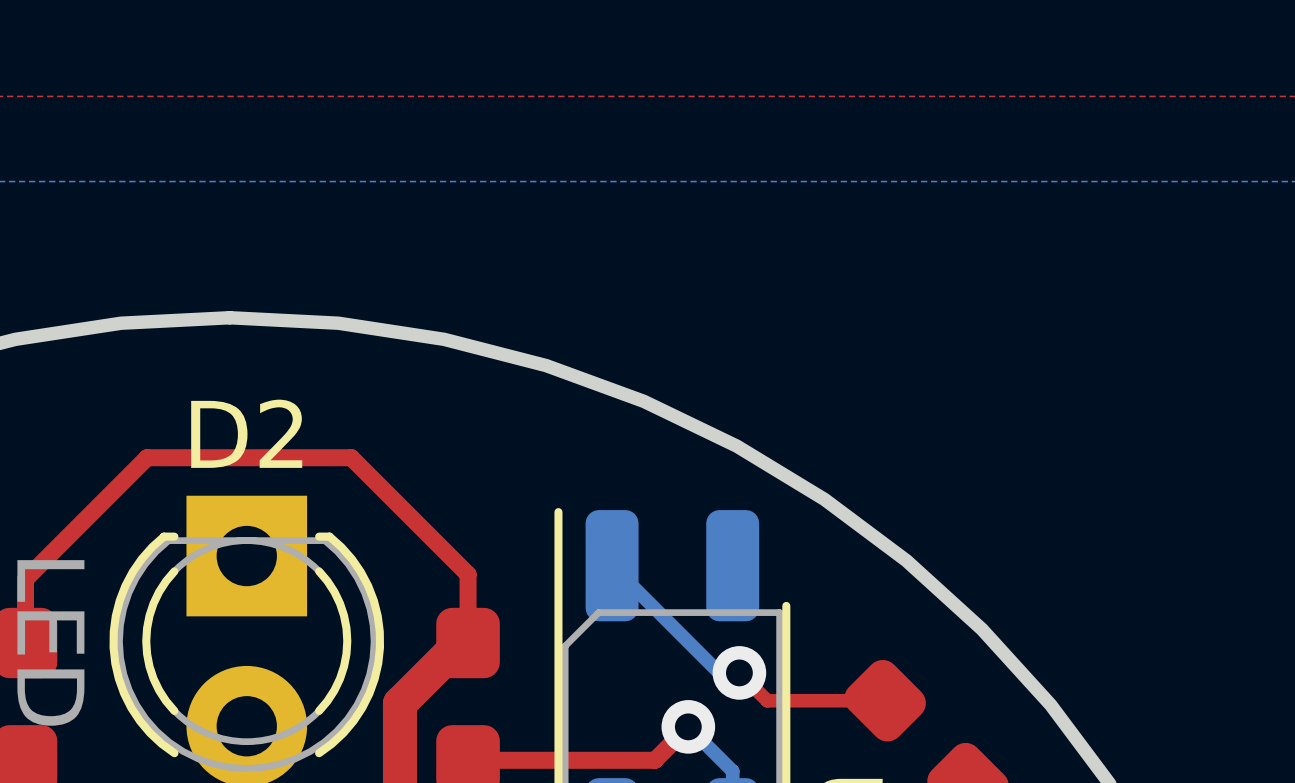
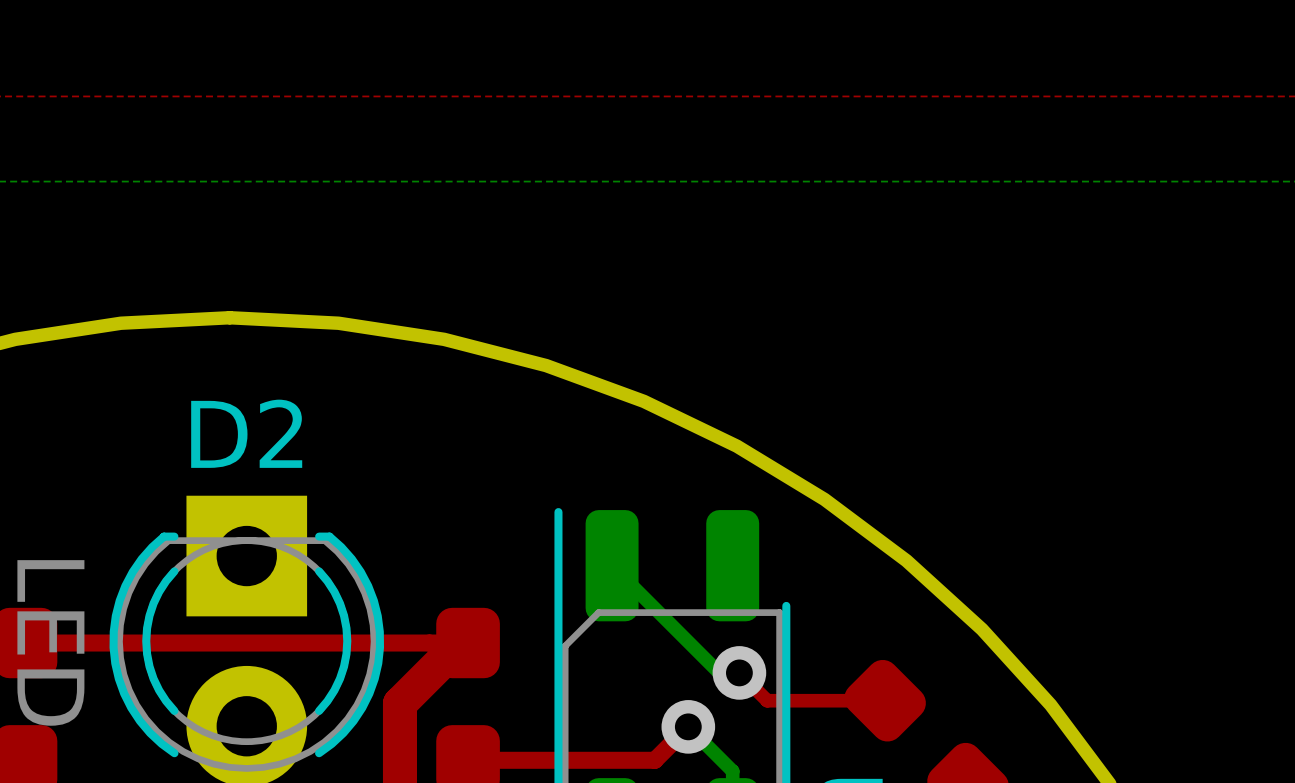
top track: (468, 643) (468, 574) (351, 457) (147, 457) (25, 579) (25, 643) -> (460, 643) (25, 643)

